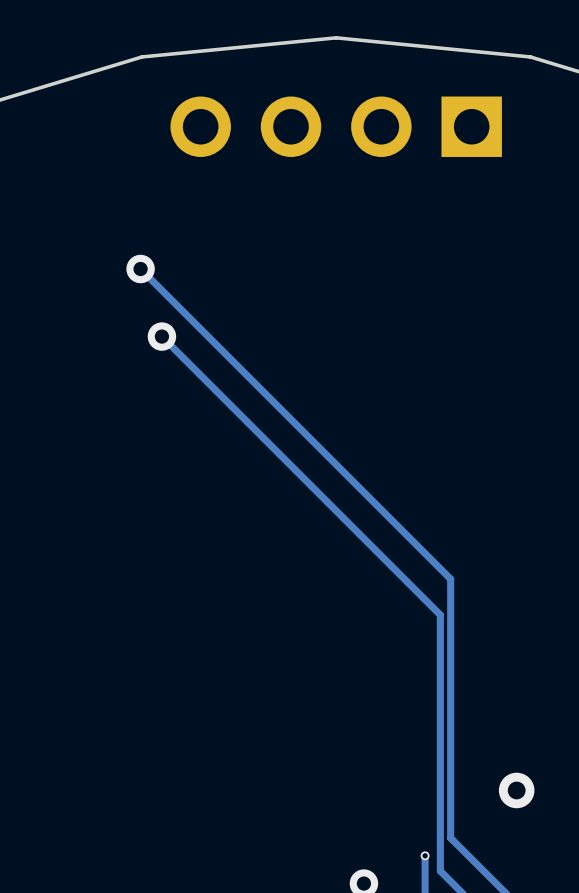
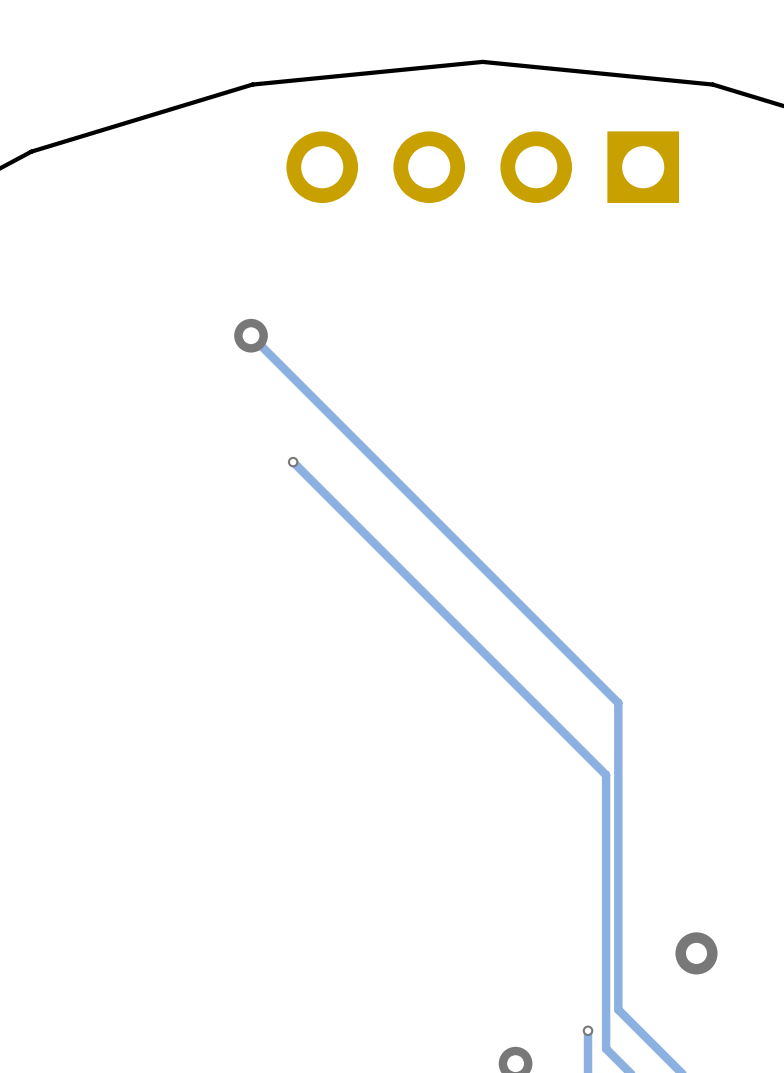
track: (161, 336) (440, 615) (440, 639) -> (293, 462) (606, 775)
via: (161, 336) -> none
via: none -> (293, 462)

